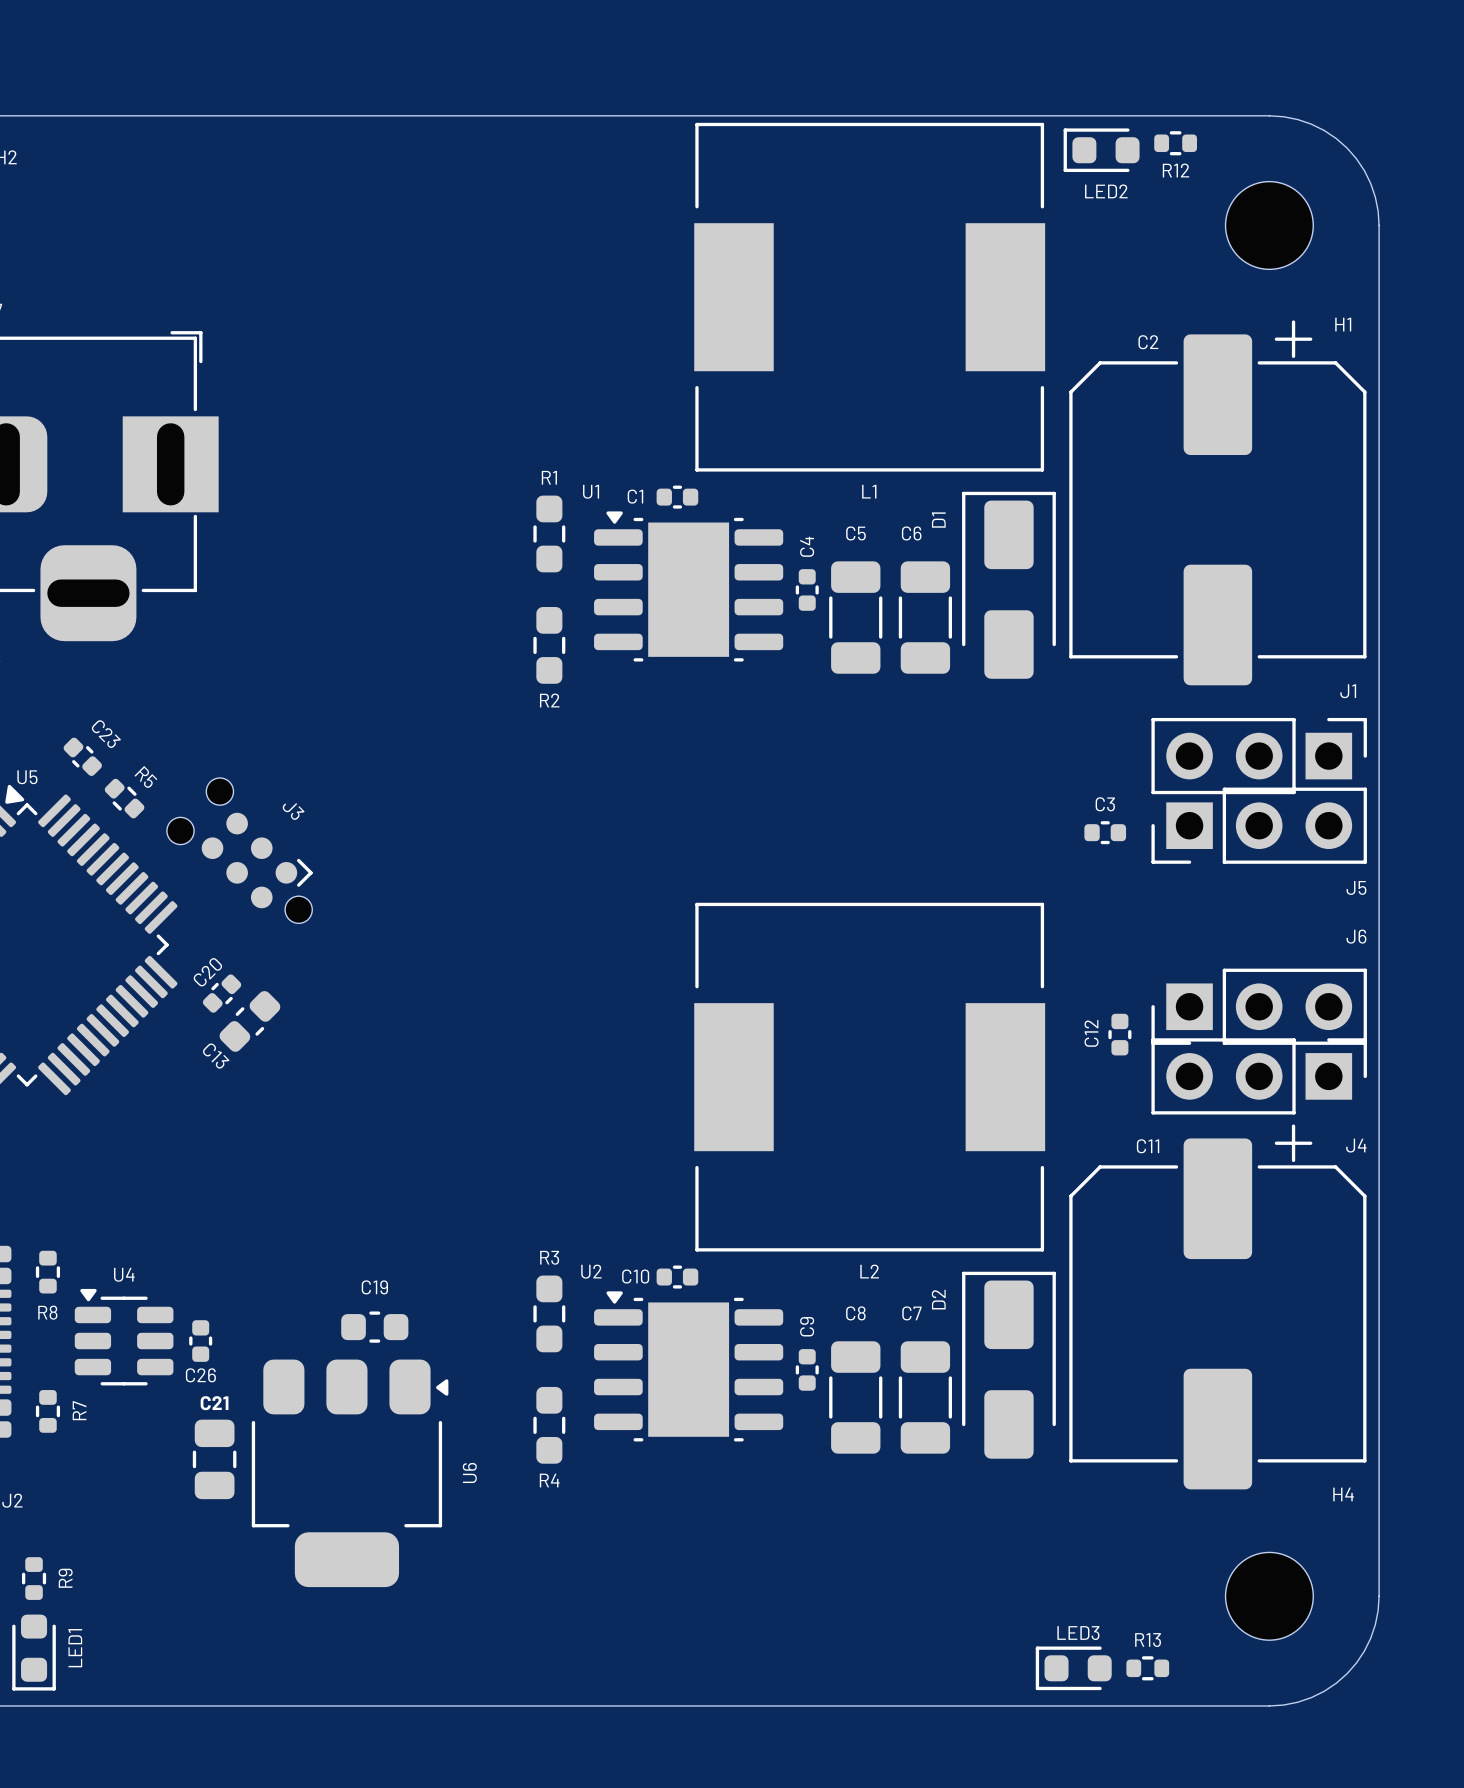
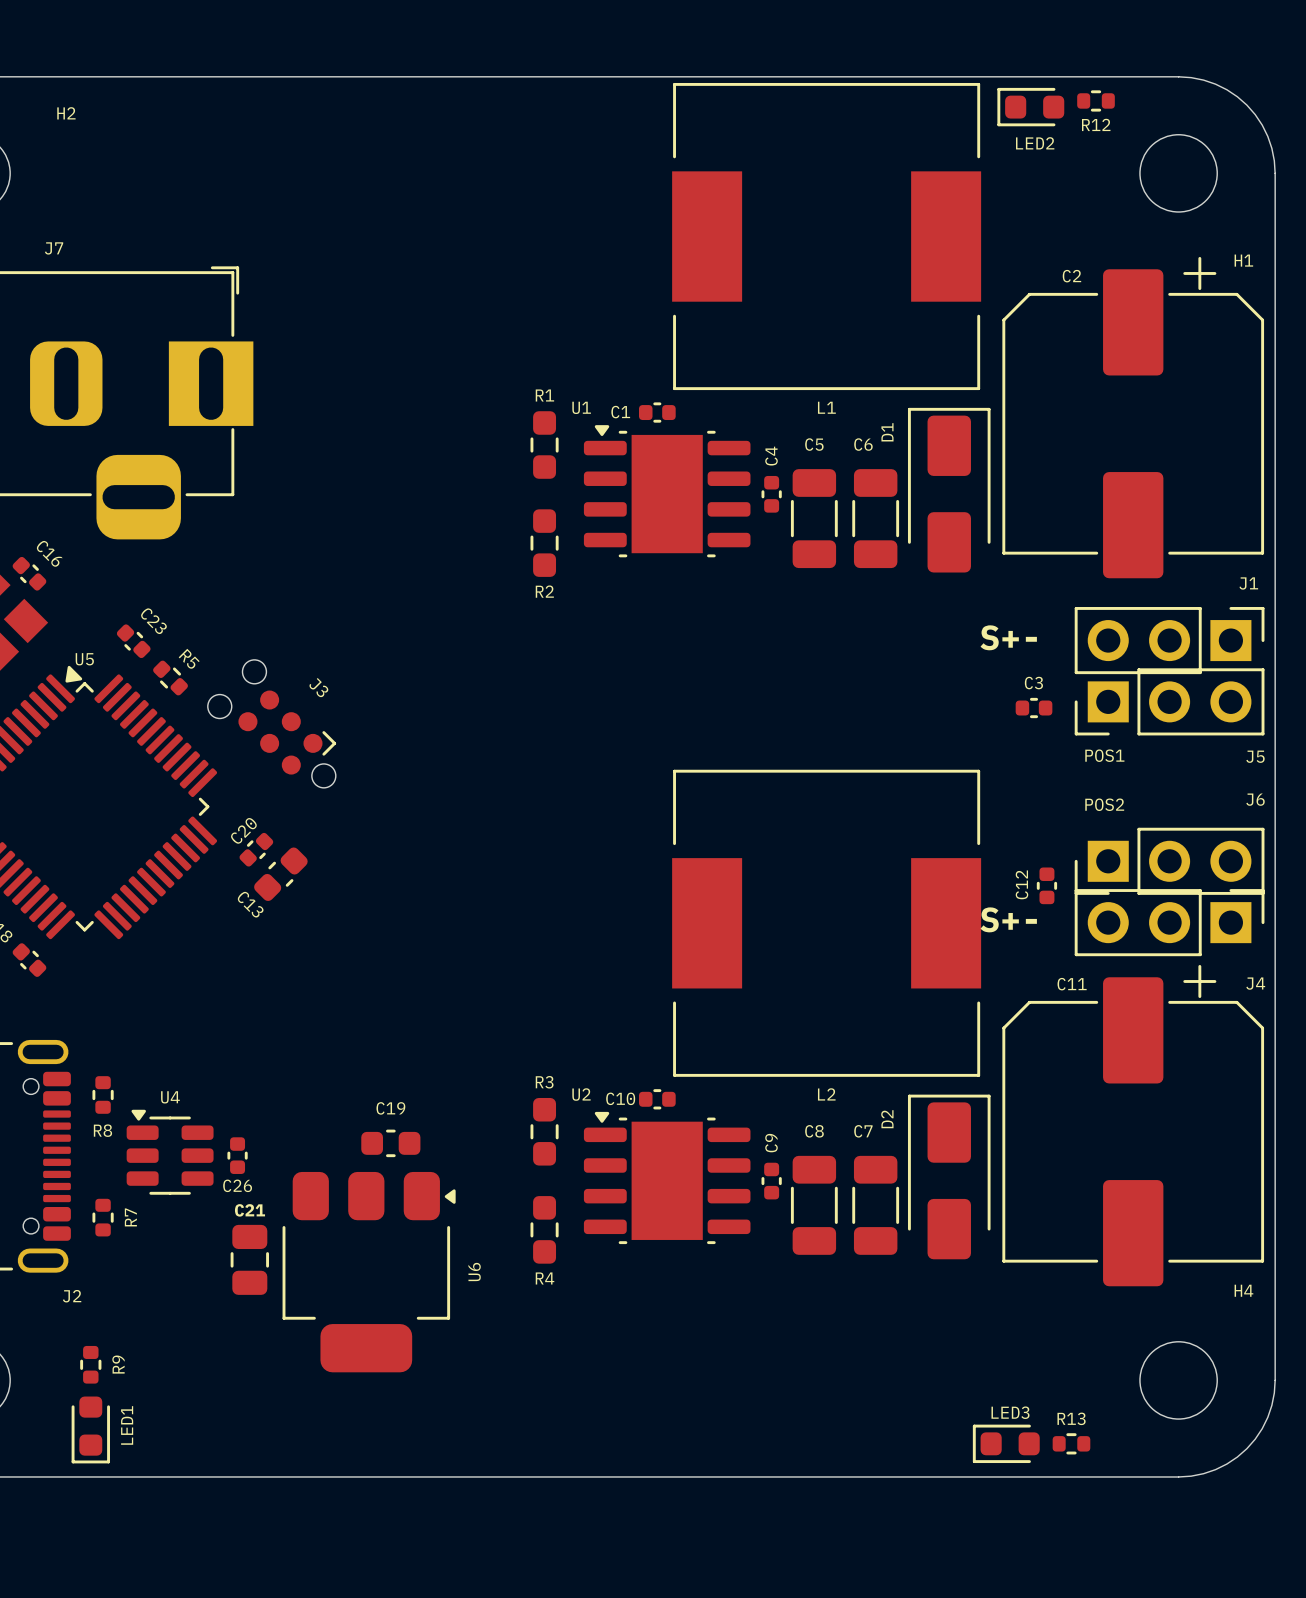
text: none -> S+- (1008, 637)
text: none -> POS1 (1104, 755)
text: none -> POS2 (1104, 804)
text: none -> S+- (1008, 919)

